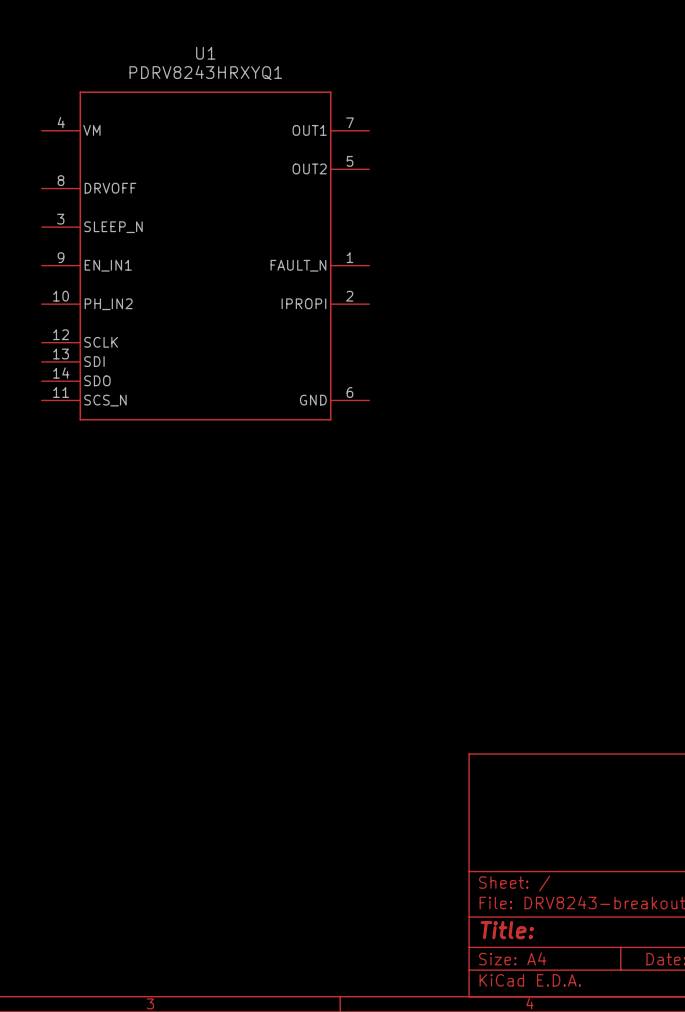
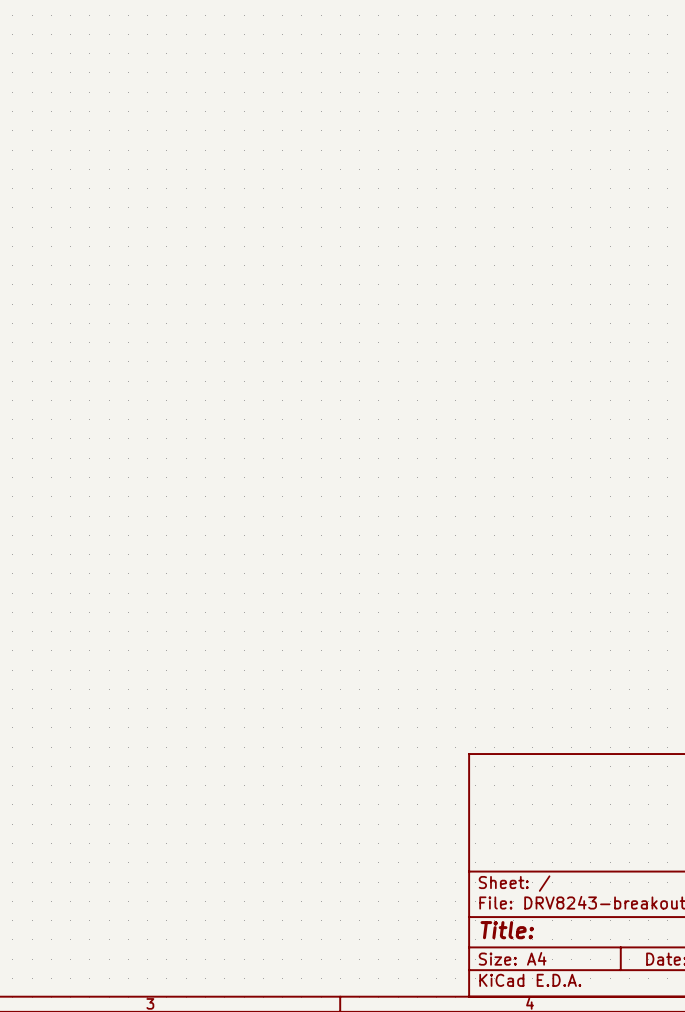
U1: PDRV8243HRXYQ1 (205, 255) -> none

